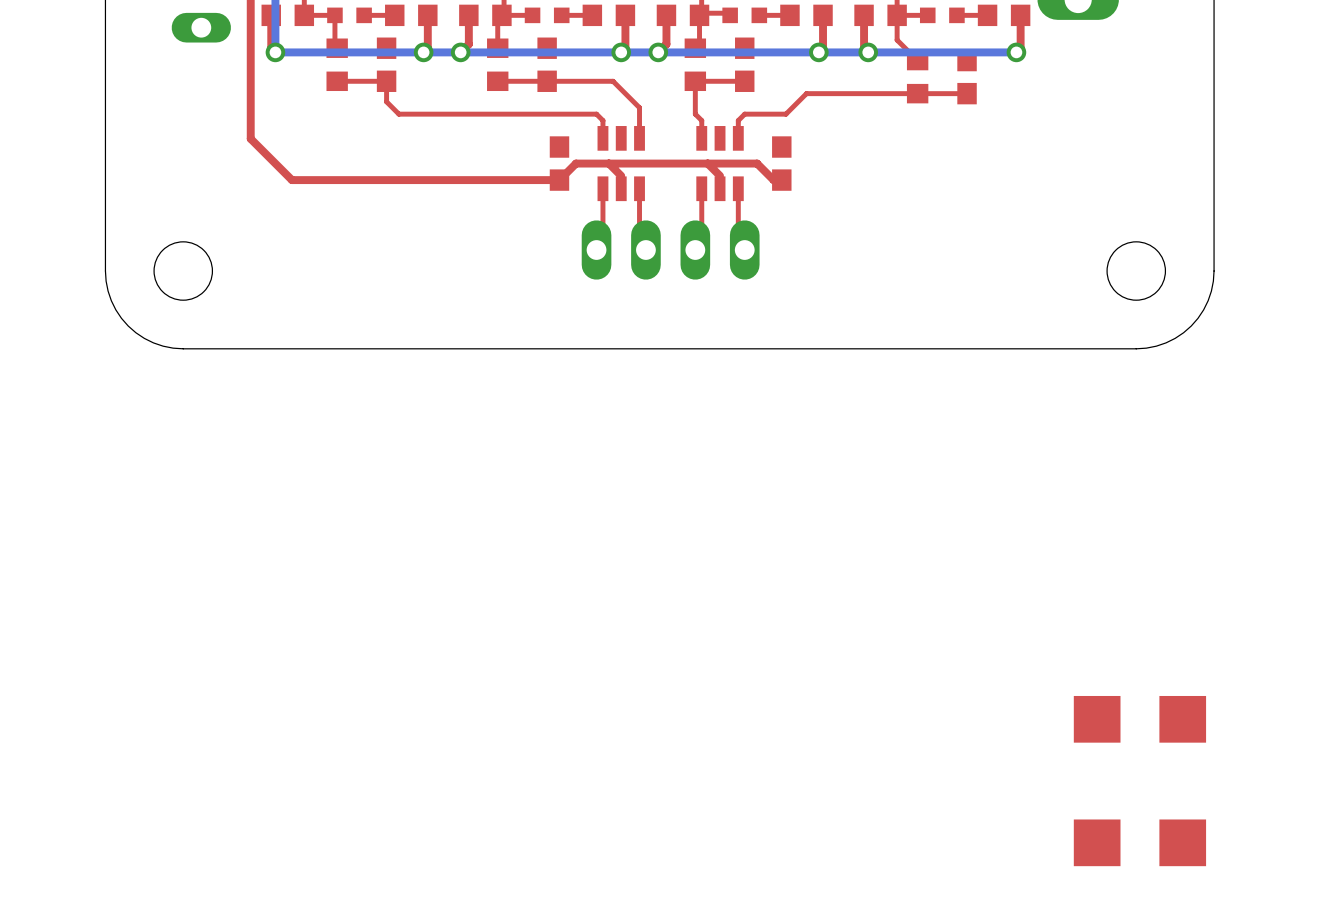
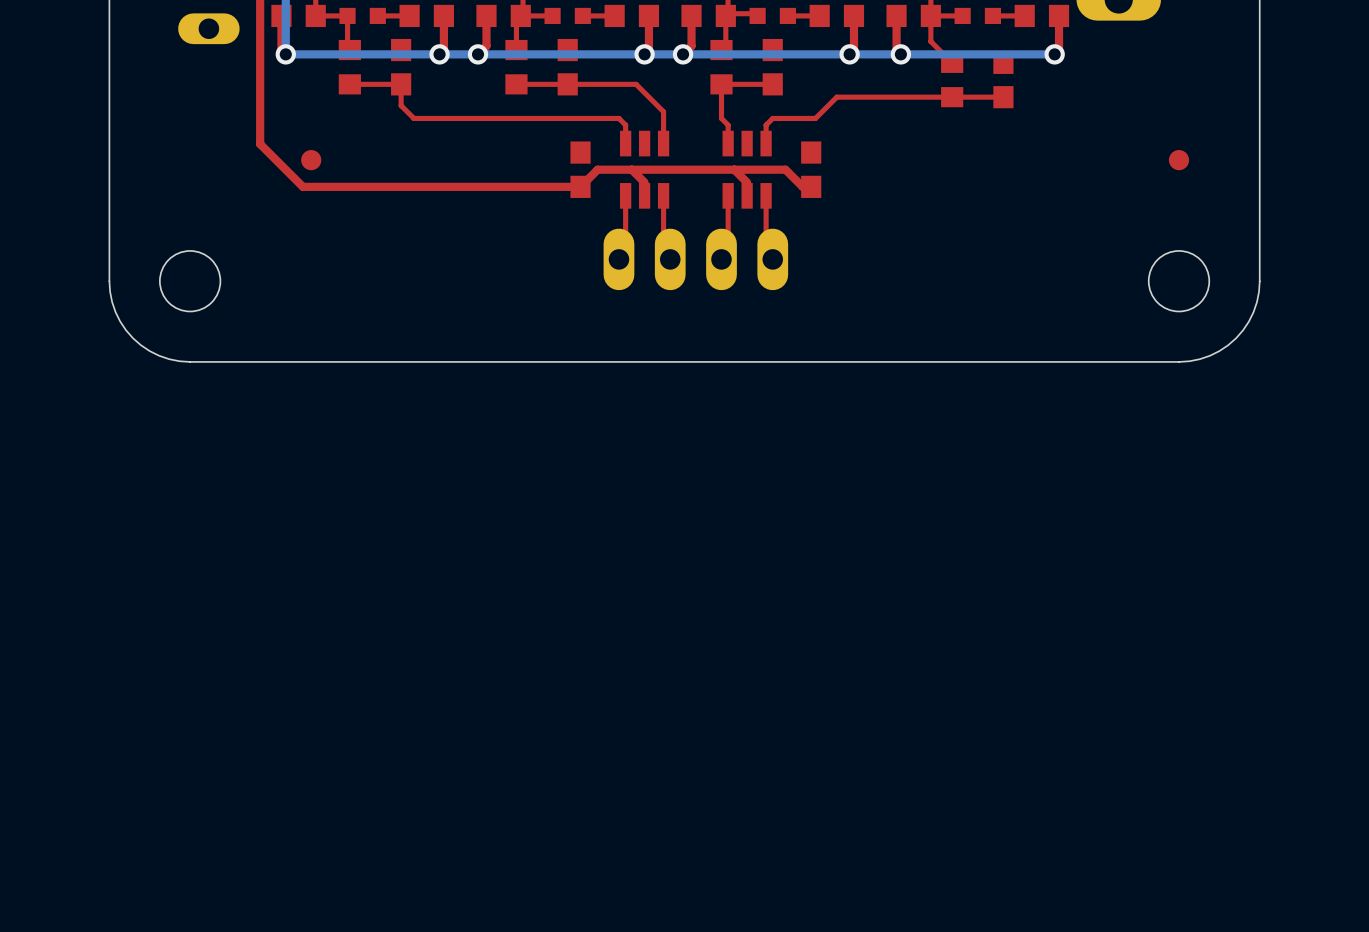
part: none -> (311, 160)
part: none -> (1179, 160)
part: (1139, 719) -> none
part: (1139, 842) -> none

